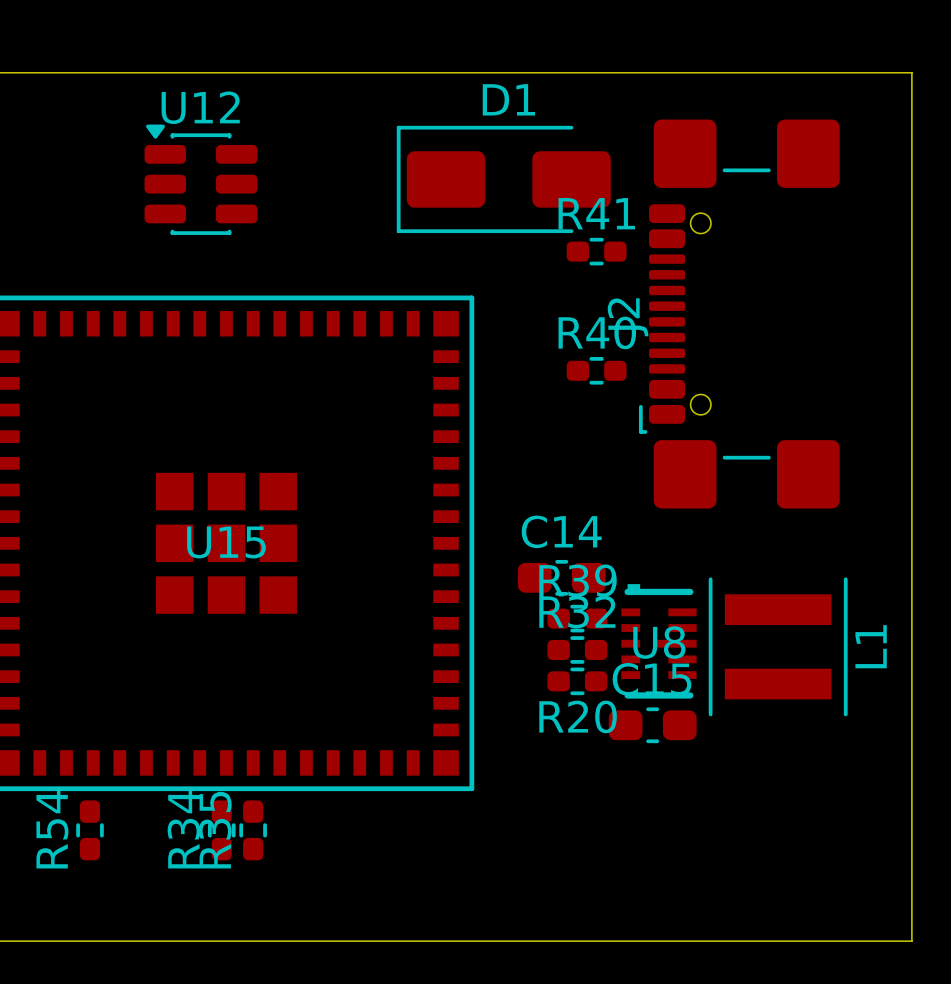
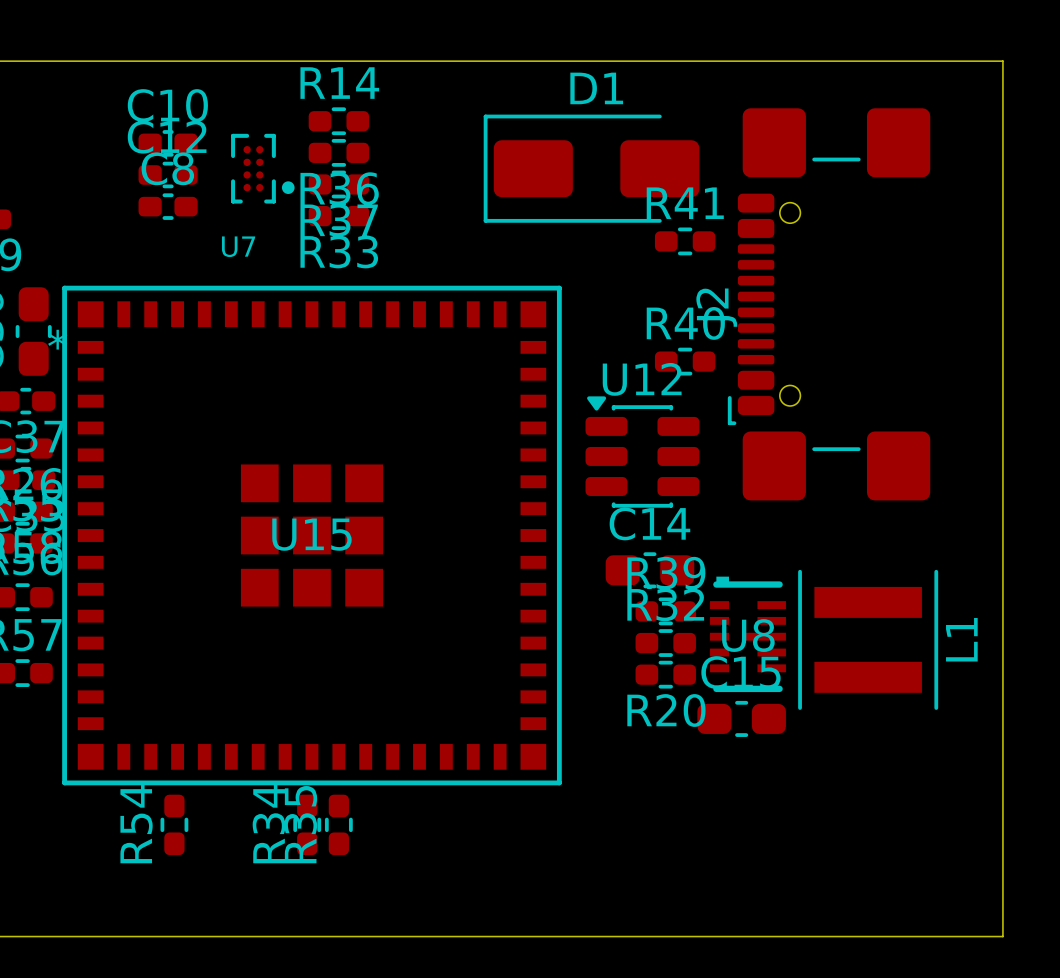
R14: none -> (338, 121)
C10: none -> (168, 143)
R36: none -> (338, 152)
U7: none -> (262, 168)
U12 position: (200, 179) -> (642, 452)
C12: none -> (168, 175)
R37: none -> (338, 184)
C8: none -> (168, 206)
R33: none -> (338, 216)

